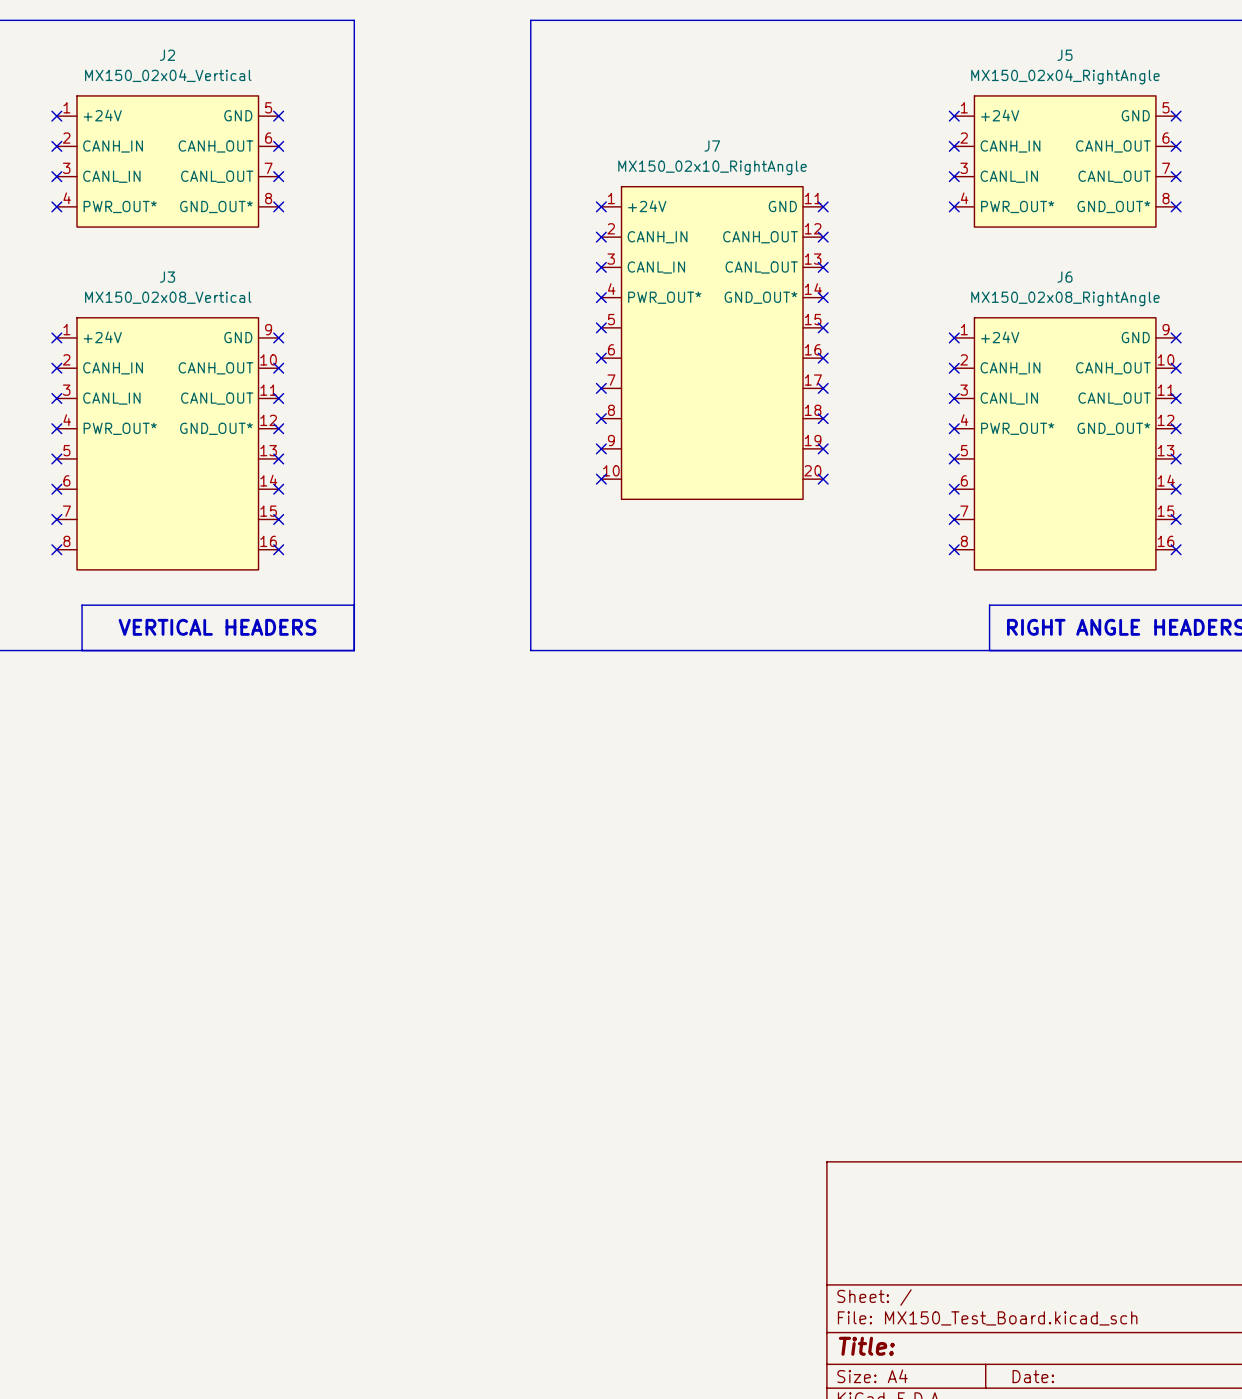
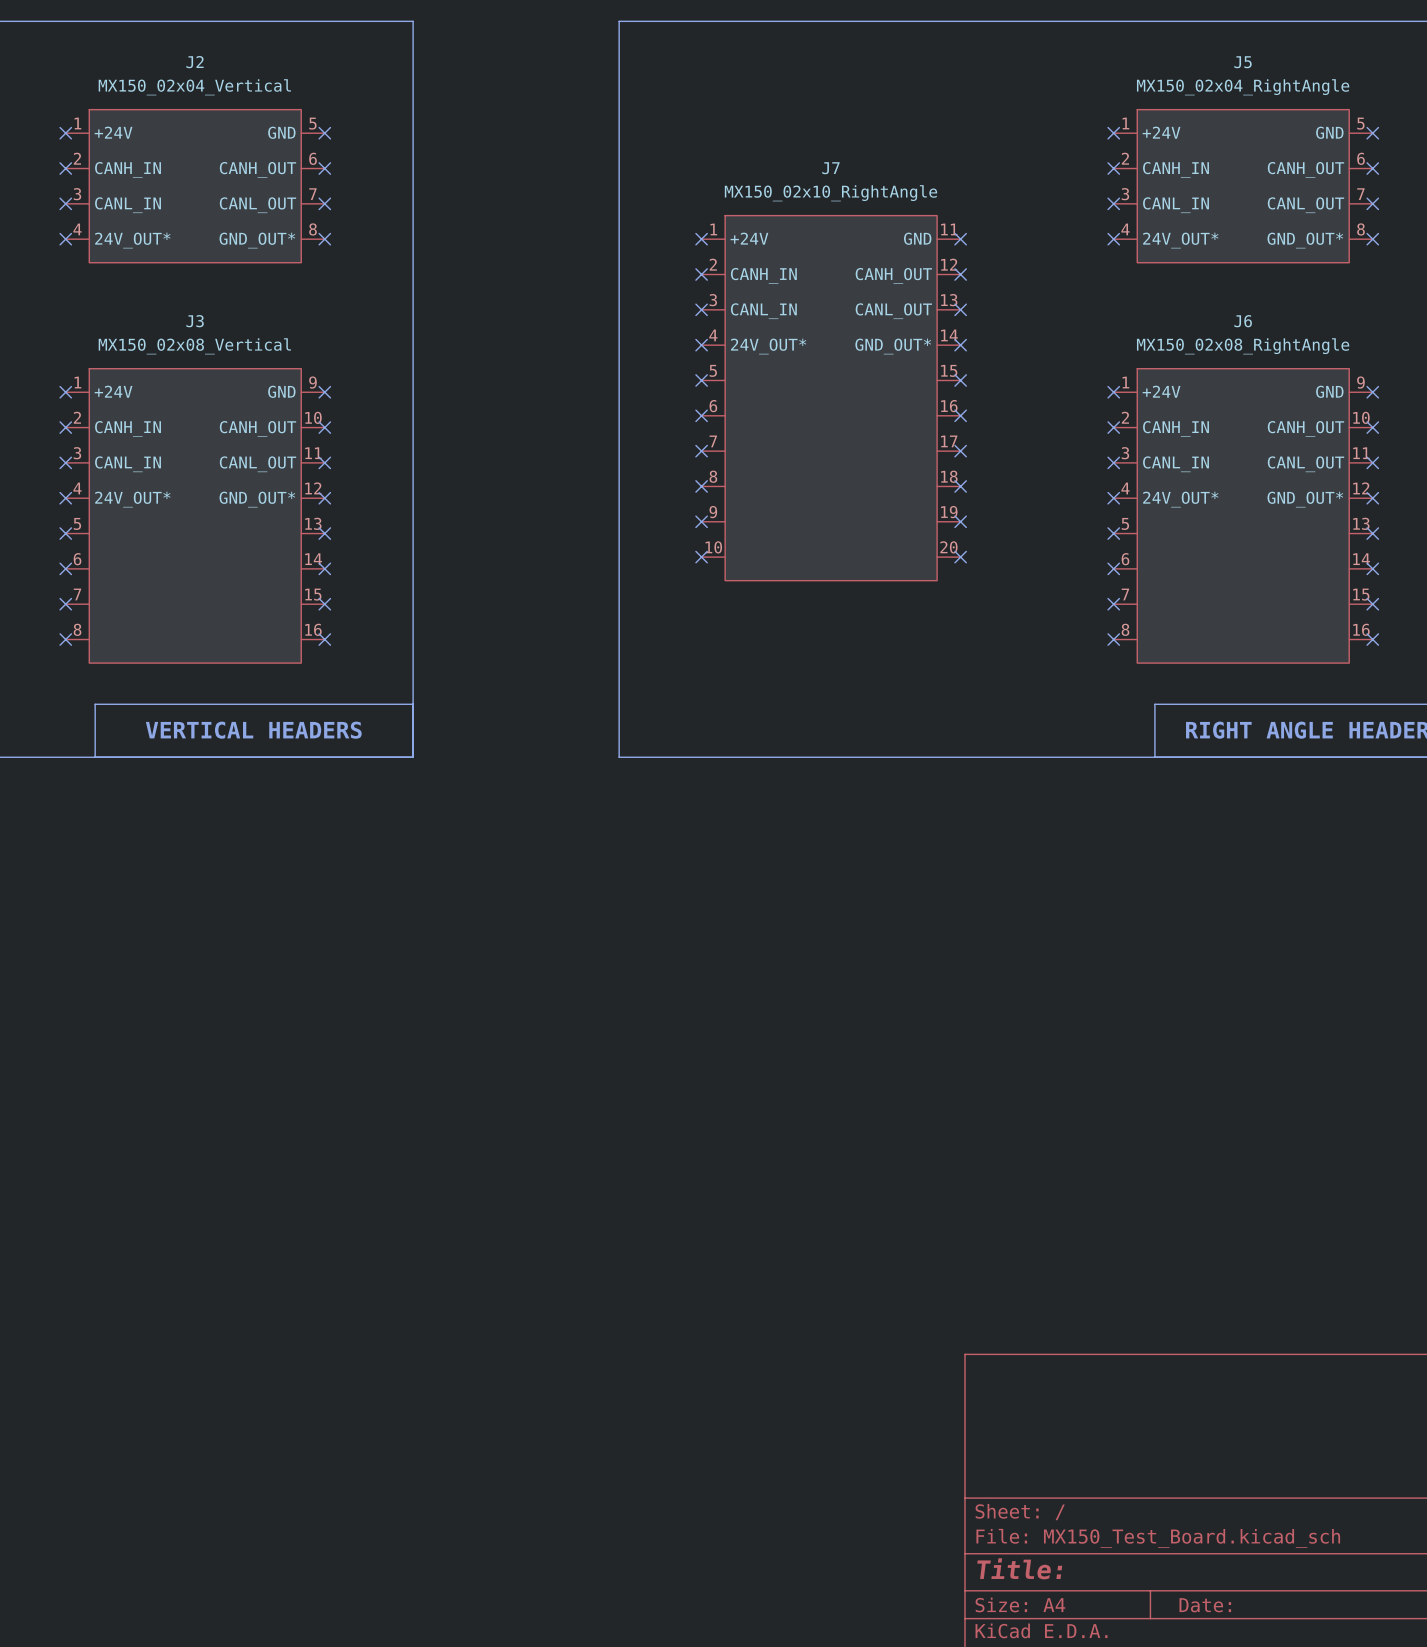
J2 pin name: PWR_OUT* (120, 206) -> 24V_OUT* (132, 240)
J5 pin name: PWR_OUT* (1017, 206) -> 24V_OUT* (1180, 240)
J7 pin name: PWR_OUT* (664, 297) -> 24V_OUT* (768, 346)
J3 pin name: PWR_OUT* (120, 428) -> 24V_OUT* (132, 499)
J6 pin name: PWR_OUT* (1017, 428) -> 24V_OUT* (1180, 499)

